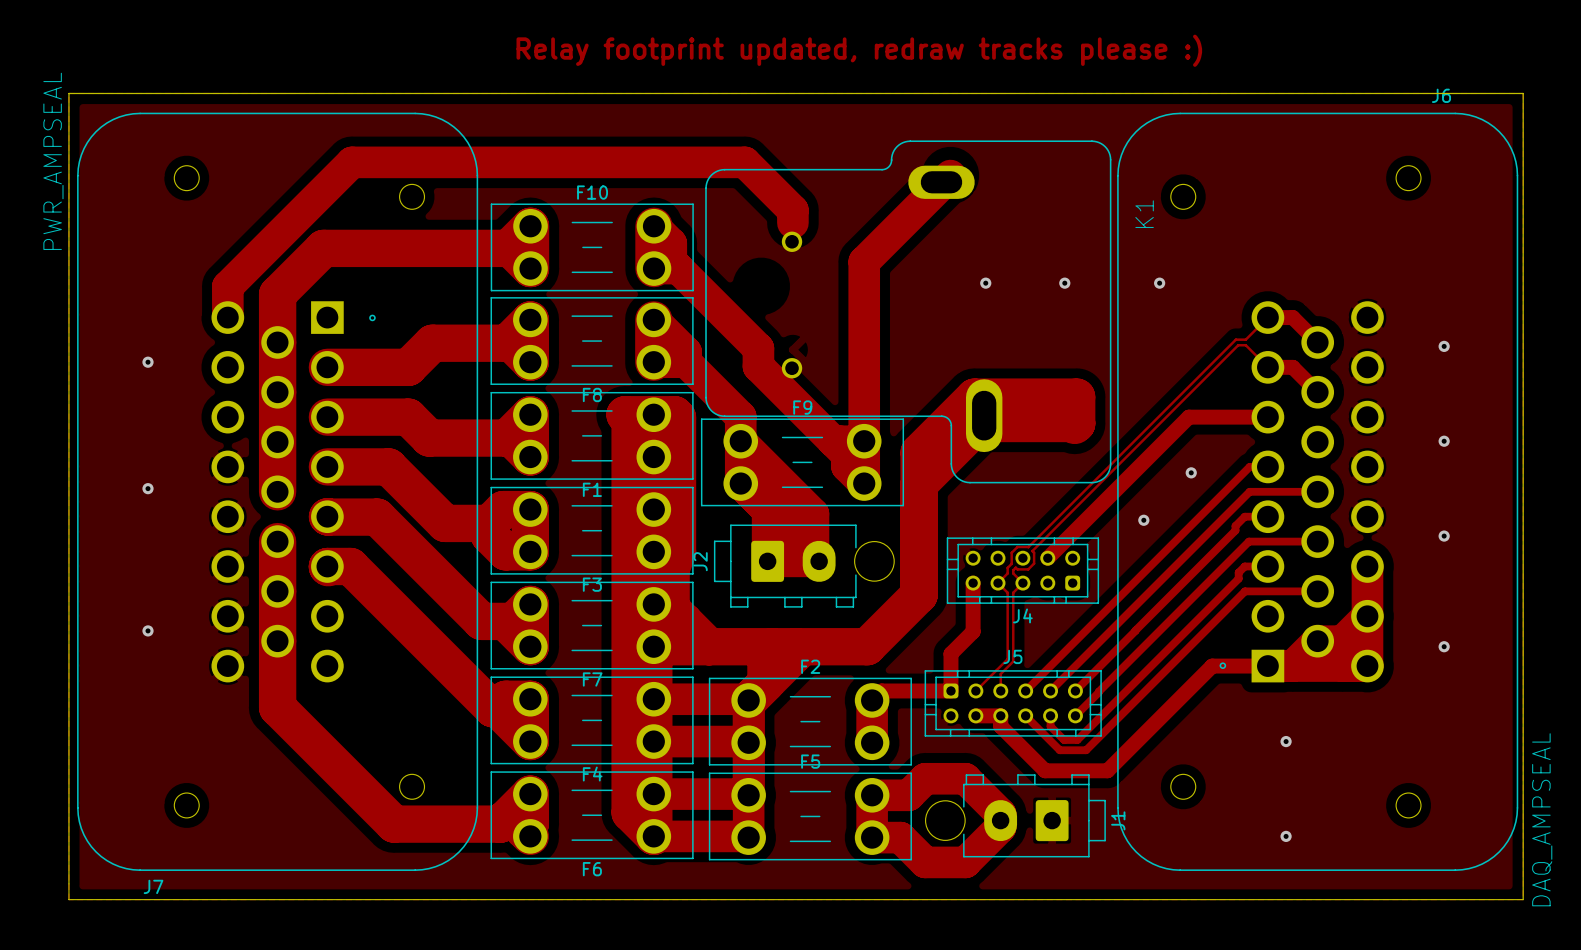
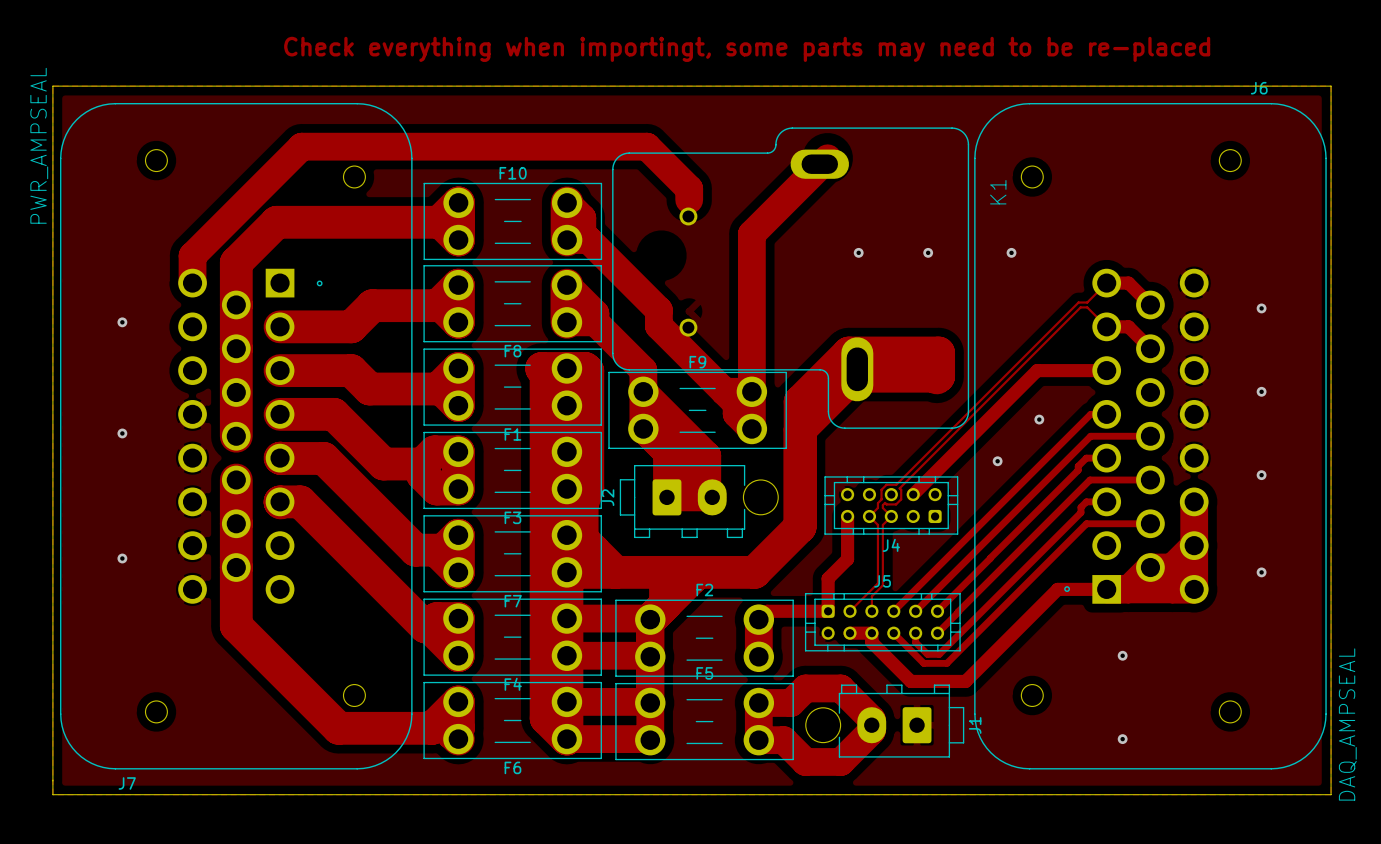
text: Relay footprint updated, redraw tracks please :) (859, 50) -> Check everything when importingt, some parts may need to be re-placed (747, 49)

